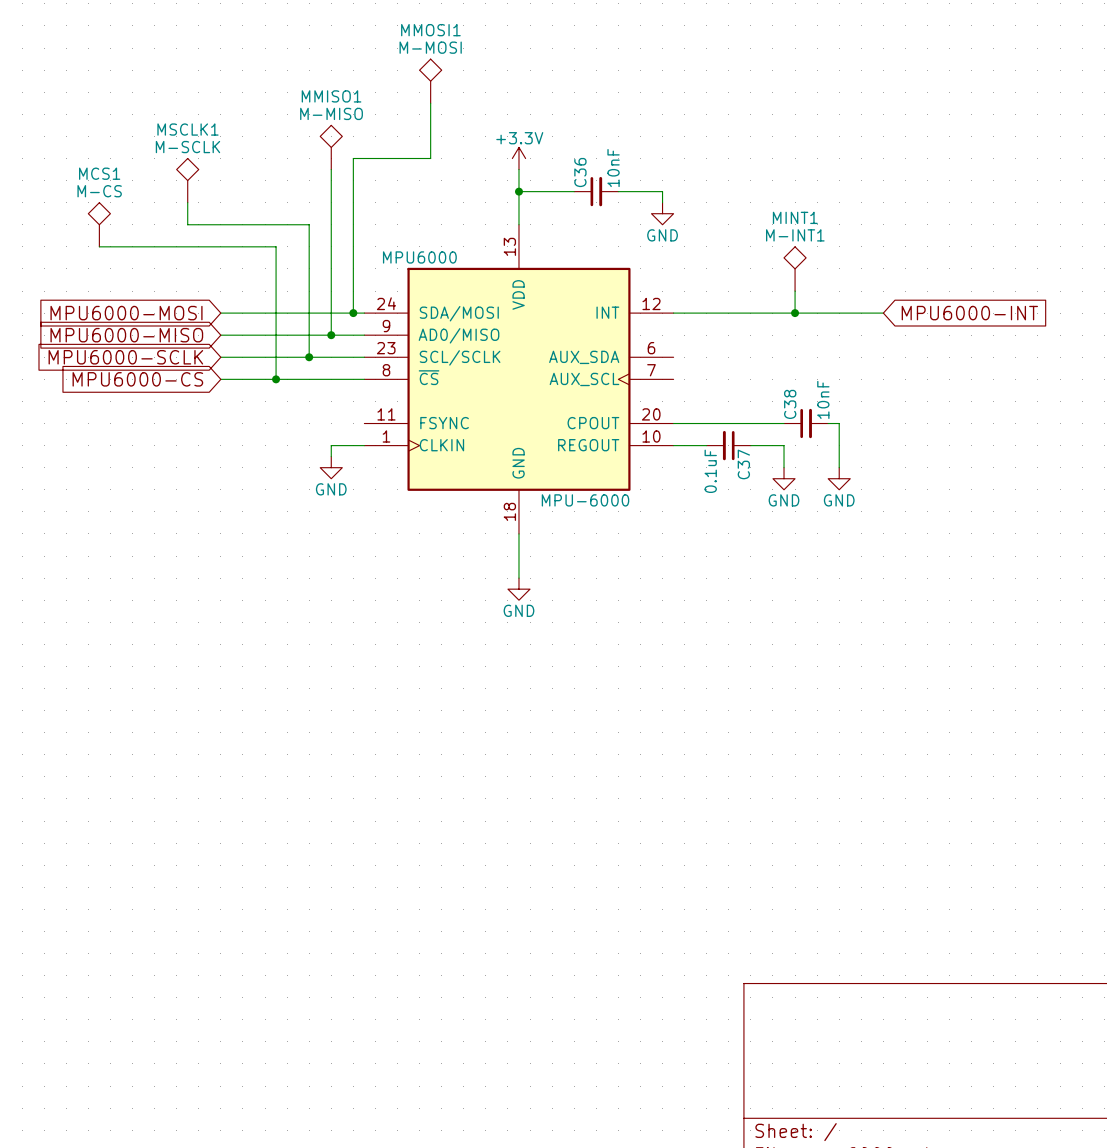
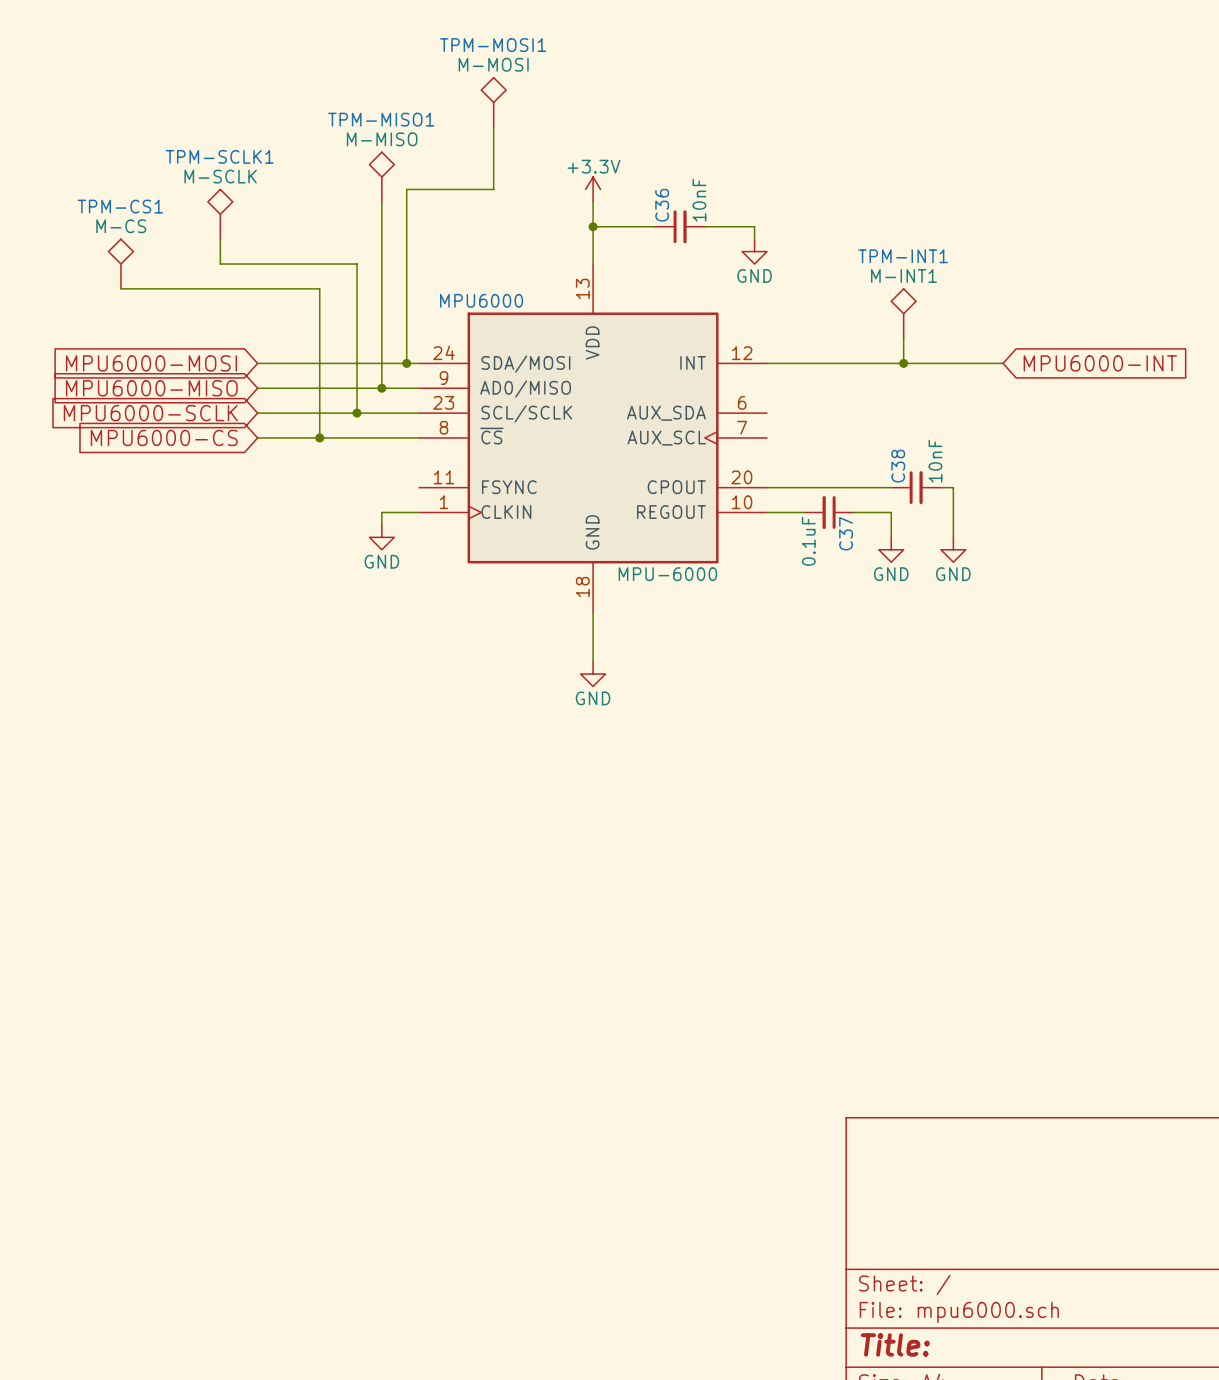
MMOSI1 name: MMOSI1 (430, 30) -> TPM-MOSI1 (493, 45)
MMISO1 name: MMISO1 (331, 96) -> TPM-MISO1 (381, 119)
MSCLK1 name: MSCLK1 (187, 129) -> TPM-SCLK1 (219, 156)
MCS1 name: MCS1 (99, 173) -> TPM-CS1 (120, 206)
MINT1 name: MINT1 (795, 217) -> TPM-INT1 (903, 256)

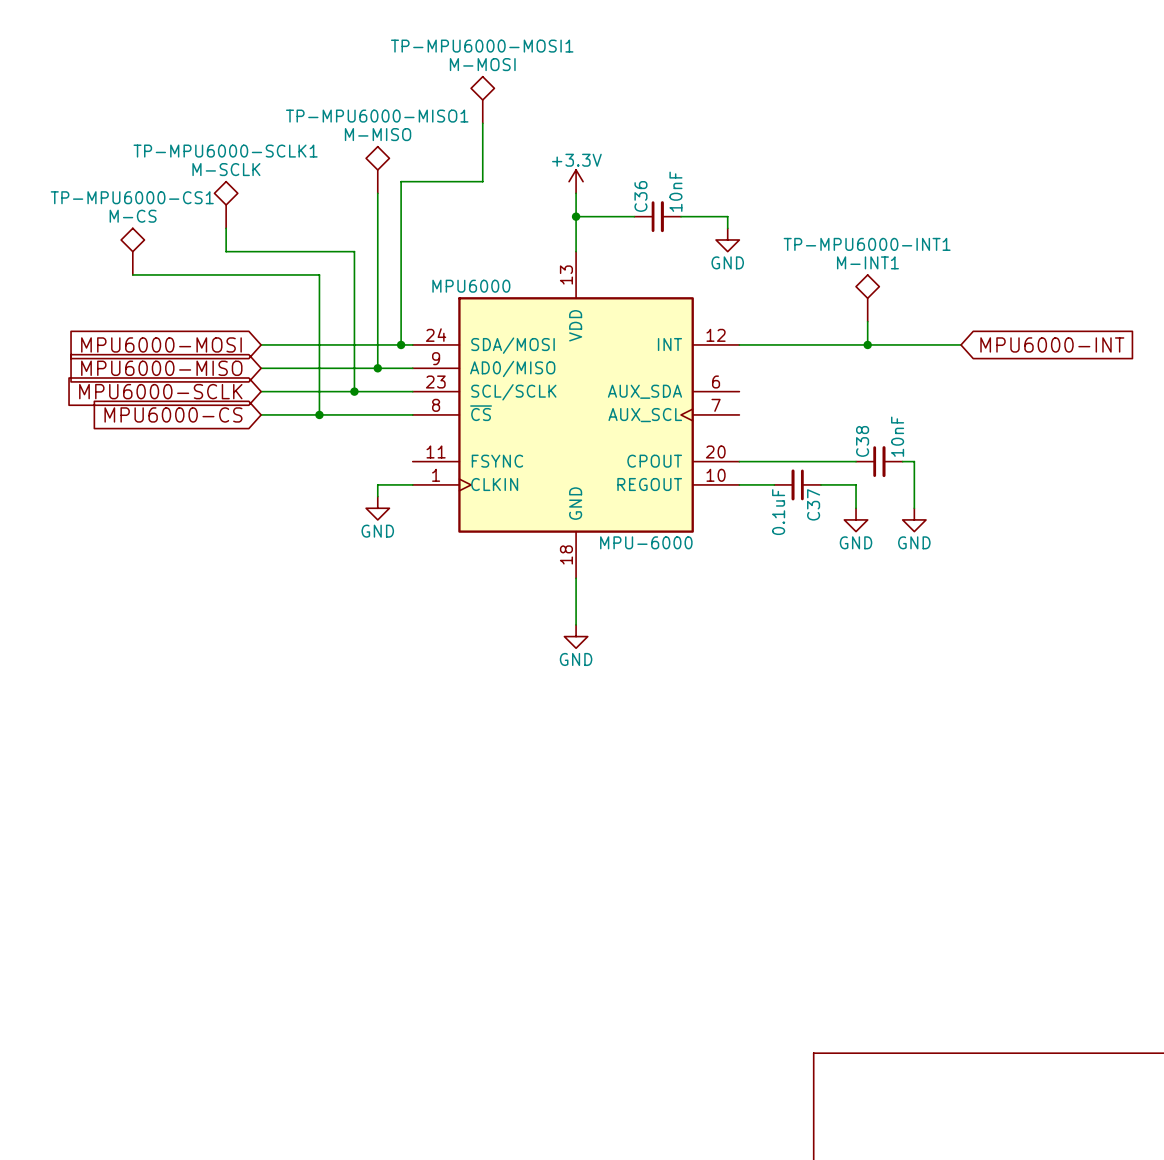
TPM-MOSI1 name: TPM-MOSI1 (493, 45) -> TP-MPU6000-MOSI1 (482, 46)
TPM-MISO1 name: TPM-MISO1 (381, 119) -> TP-MPU6000-MISO1 (377, 116)
TPM-SCLK1 name: TPM-SCLK1 (219, 156) -> TP-MPU6000-SCLK1 (225, 151)
TPM-CS1 name: TPM-CS1 (120, 206) -> TP-MPU6000-CS1 (132, 197)
TPM-INT1 name: TPM-INT1 (903, 256) -> TP-MPU6000-INT1 (867, 244)

